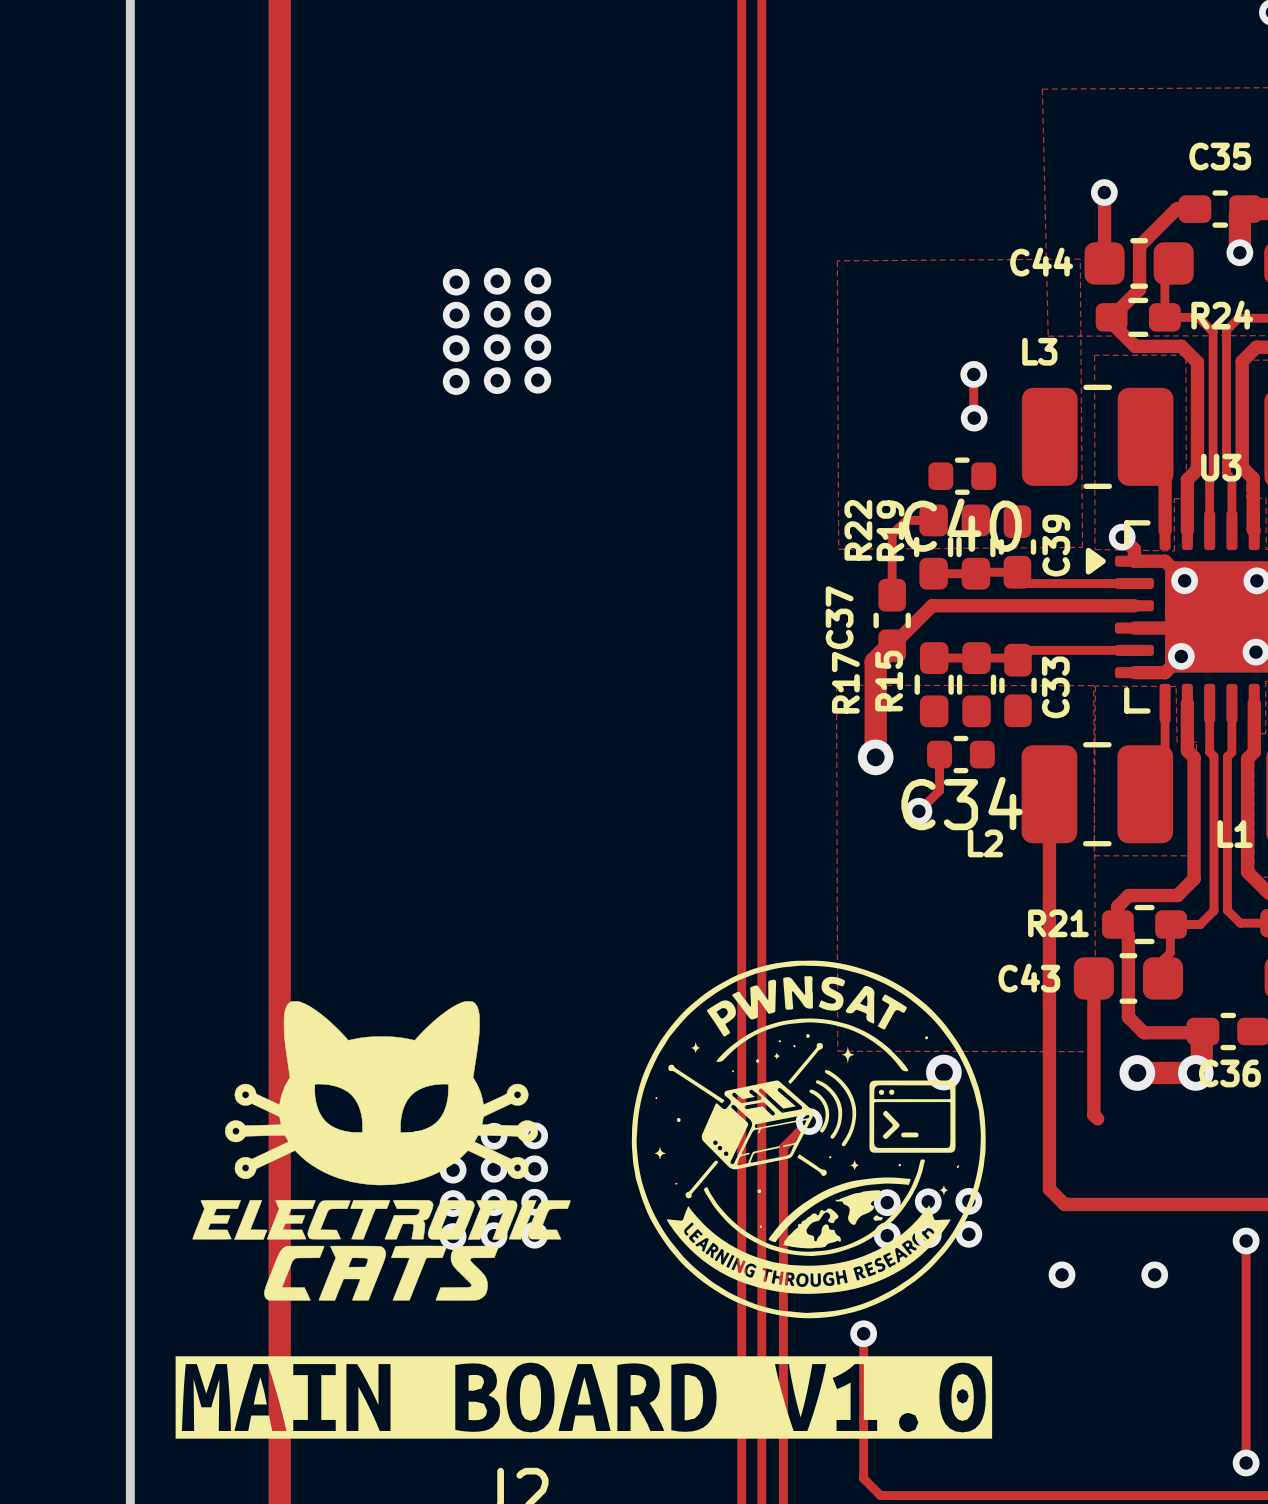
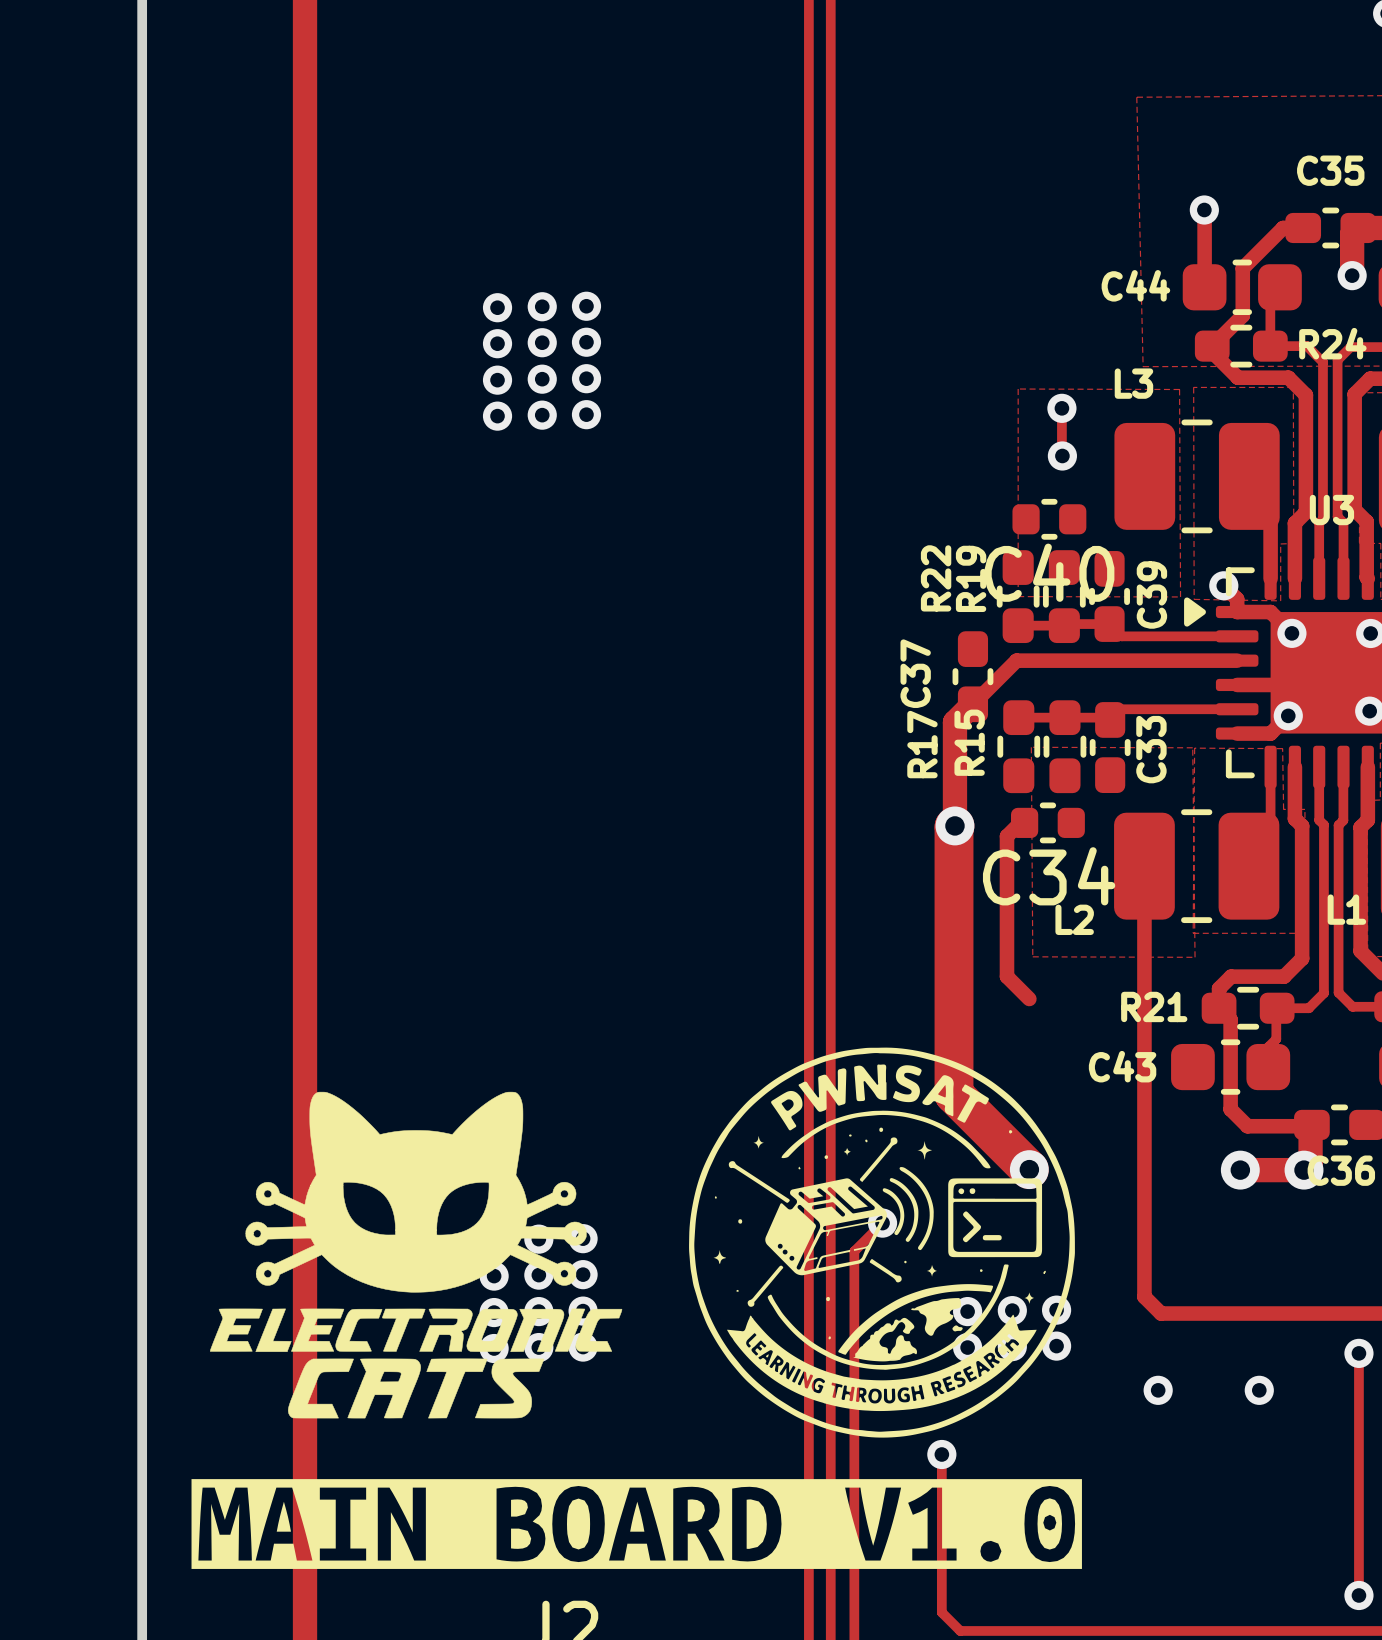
zone outline: (1080, 259) (837, 260) (838, 549) (1082, 547) (1080, 259) -> none
zone outline: none -> (1018, 389) (1179, 389) (1180, 596) (1018, 596) (1018, 389)
track: (933, 520) (906, 520) (892, 534) (892, 595) -> none
zone outline: (836, 685) (1093, 685) (1095, 1051) (837, 1051) (836, 685) -> none
zone outline: none -> (1031, 747) (1192, 747) (1195, 957) (1032, 956) (1031, 747)
track: none -> (1020, 822) (1006, 836) (1006, 976) (1029, 999)
track: (939, 754) (939, 790) (918, 811) -> none
track: none -> (954, 825) (954, 1094) (1029, 1169)
via: (918, 811) -> none
track: (1093, 978) (1093, 1115) (1097, 1118) -> none

